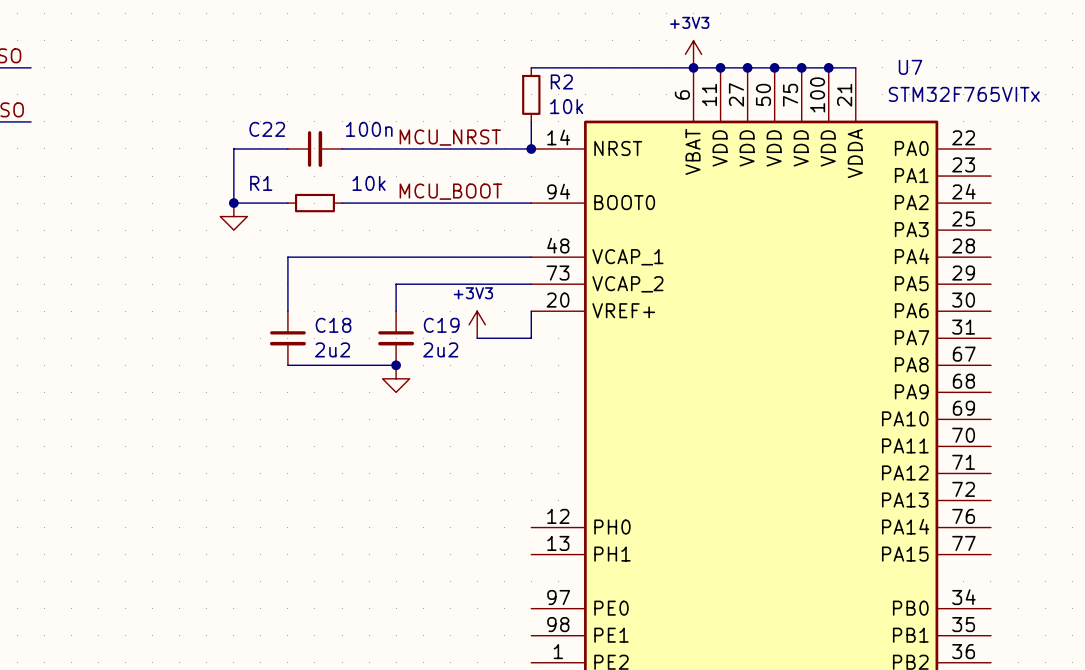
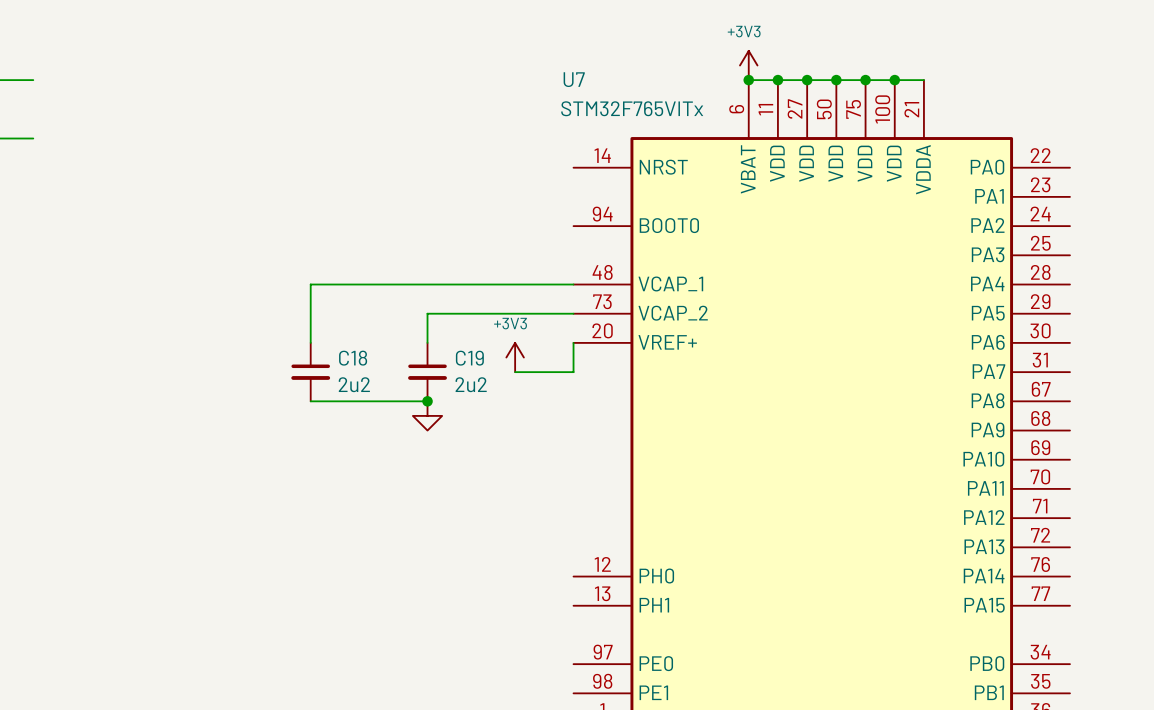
wire: (531, 67) (693, 67) -> none
U7 name position: U7 (910, 67) -> U7 (574, 79)
R2: 10k (531, 94) -> none
U7 value position: STM32F765VITx (964, 94) -> STM32F765VITx (632, 108)
wire: (531, 121) (531, 148) (342, 148) -> none
label: MCU_NRST (450, 137) -> none
wire: (287, 148) (233, 148) (233, 203) (287, 203) -> none
C22: 100n (314, 148) -> none
junction: (531, 148) -> none
label: MCU_BOOT (450, 191) -> none
junction: (233, 203) -> none
R1: 10k (314, 203) -> none
wire: (342, 203) (531, 203) -> none
power symbol: (233, 216) -> none

